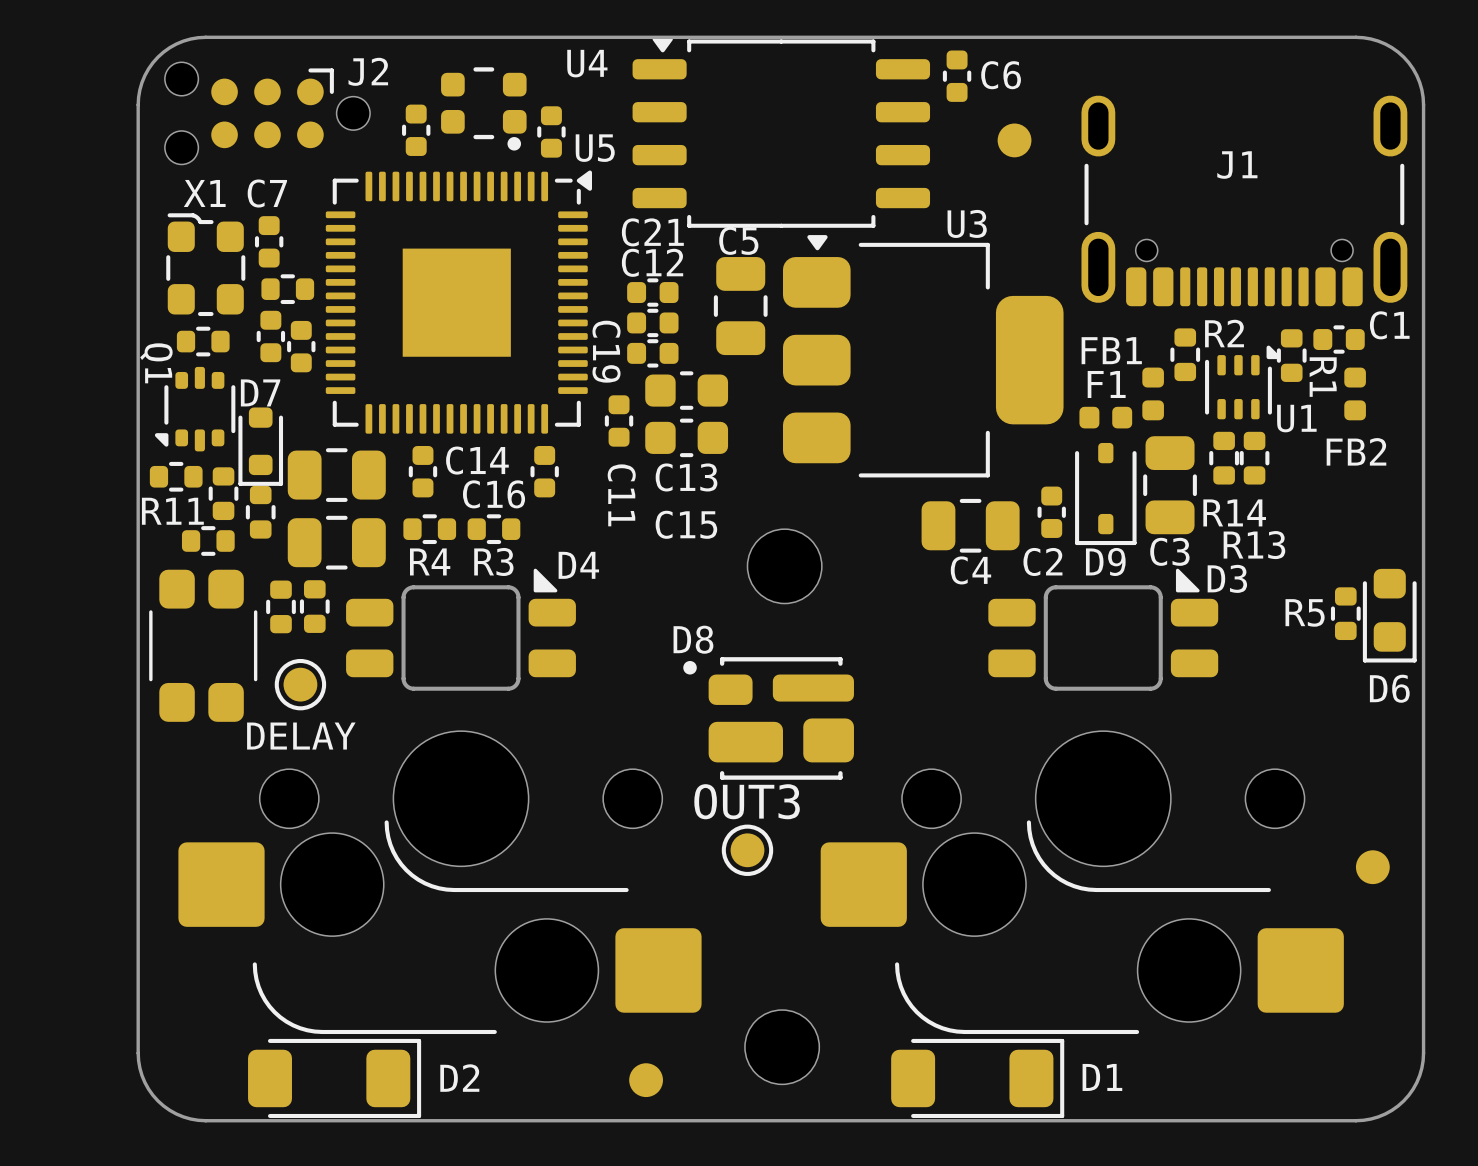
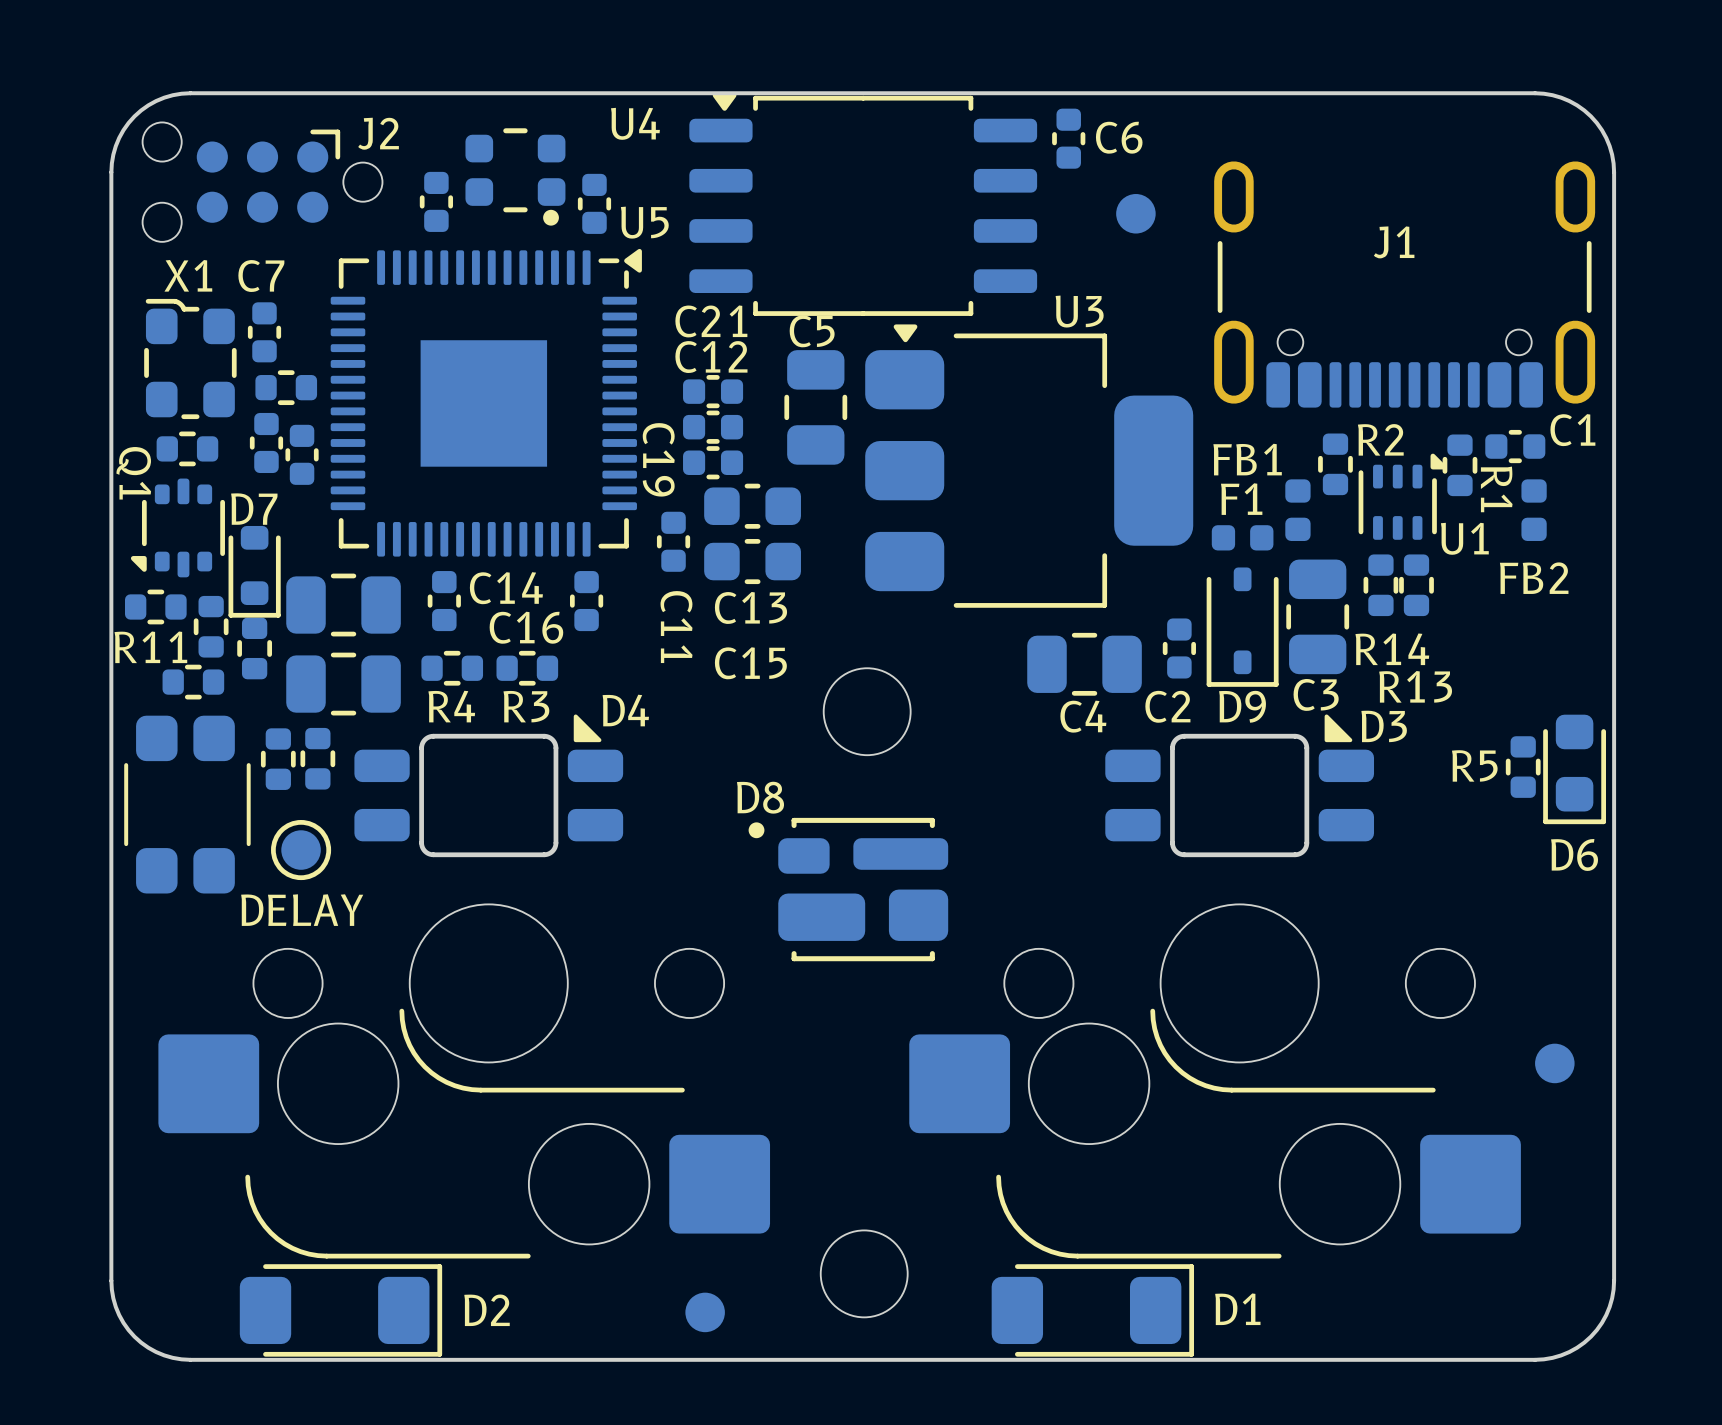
part: OUT3 (747, 850) -> none

